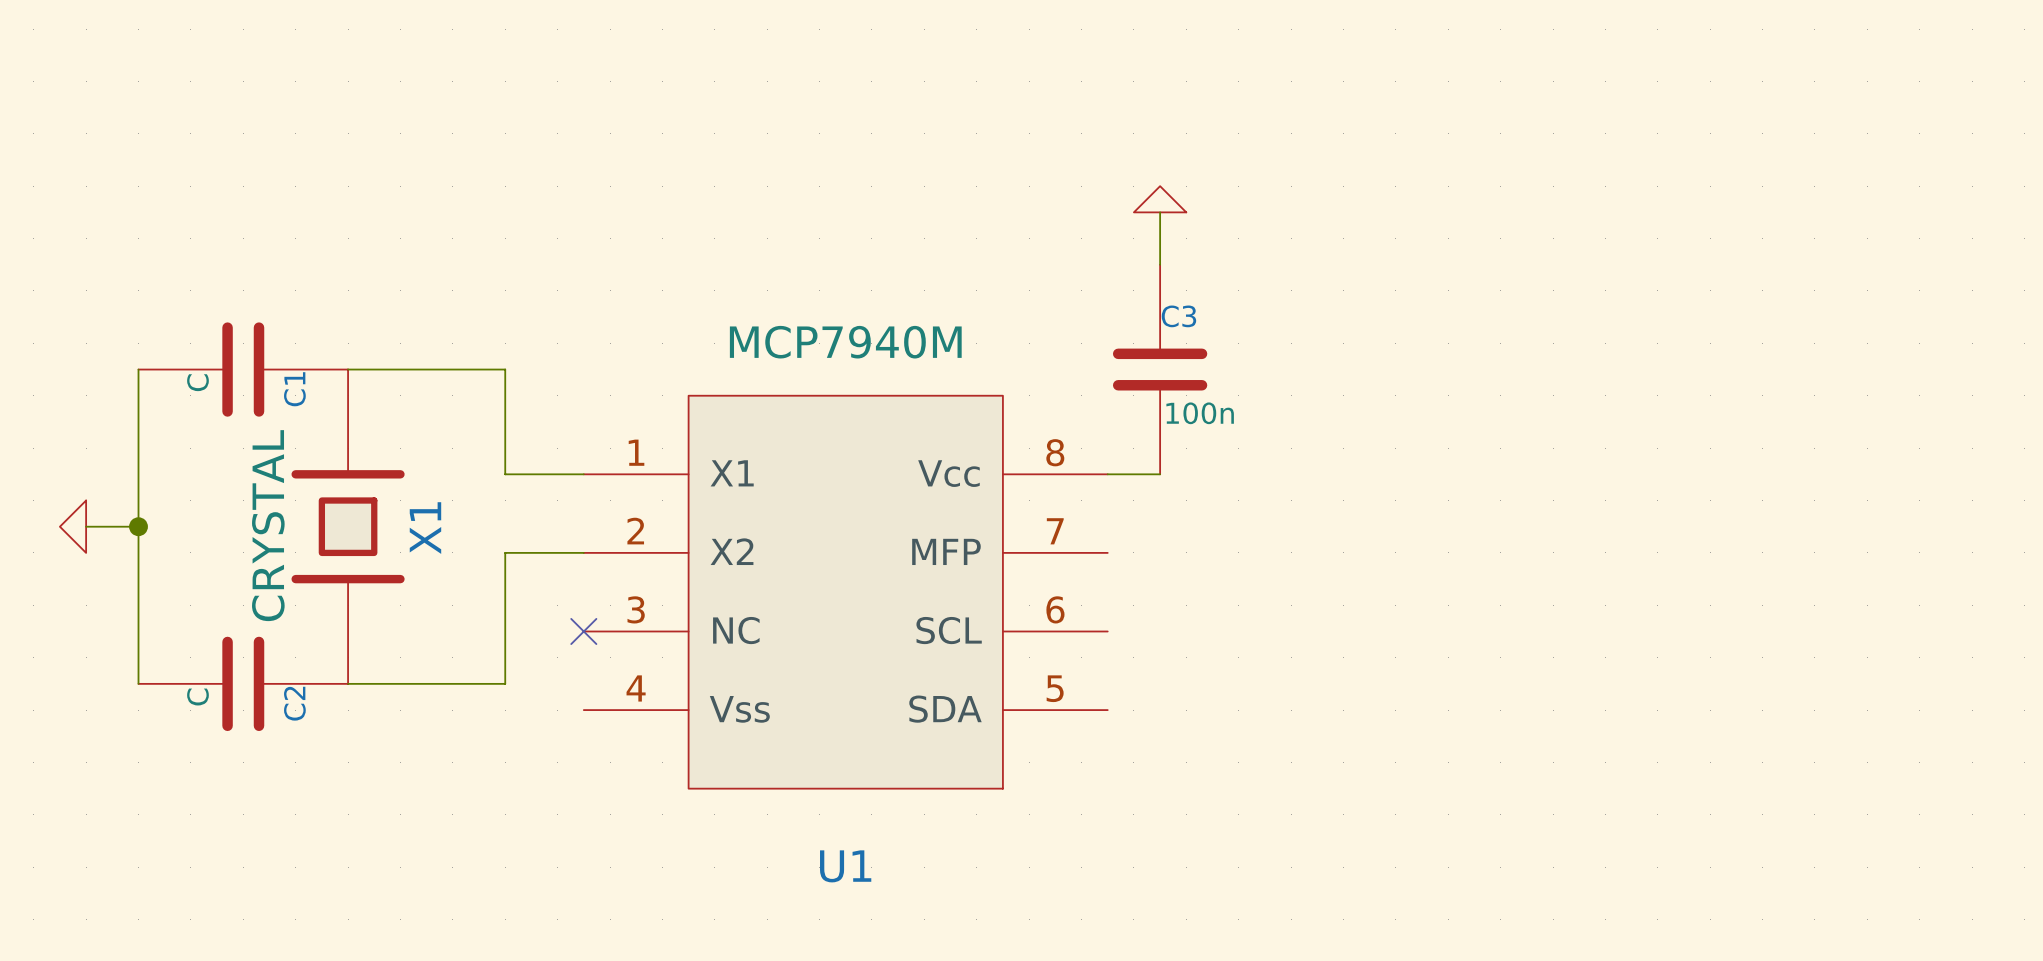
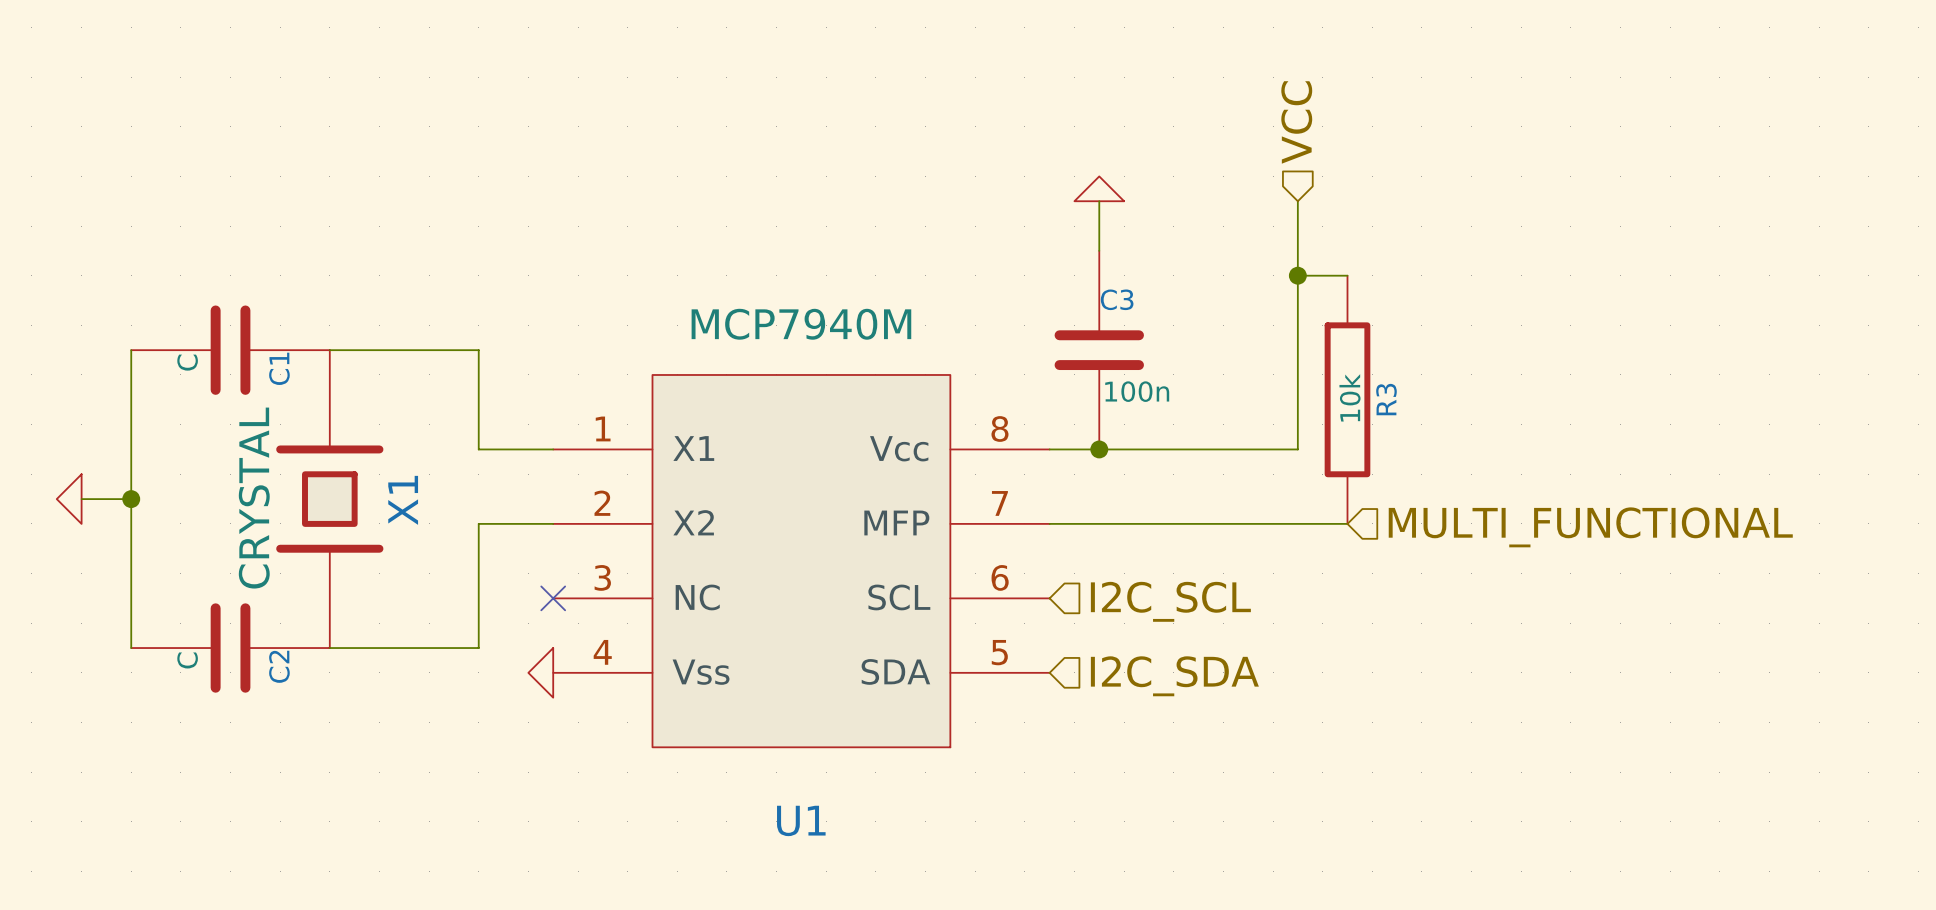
hierarchical label: none -> VCC (1296, 122)
wire: none -> (1297, 201) (1297, 449) (1099, 449)
wire: none -> (1297, 275) (1347, 275)
junction: none -> (1297, 275)
R3: none -> 10k (1347, 399)
junction: none -> (1099, 449)
wire: none -> (1049, 523) (1347, 523)
hierarchical label: none -> MULTI_FUNCTIONAL (1590, 527)
hierarchical label: none -> I2C_SCL (1170, 601)
power symbol: none -> (540, 672)
hierarchical label: none -> I2C_SDA (1174, 676)

